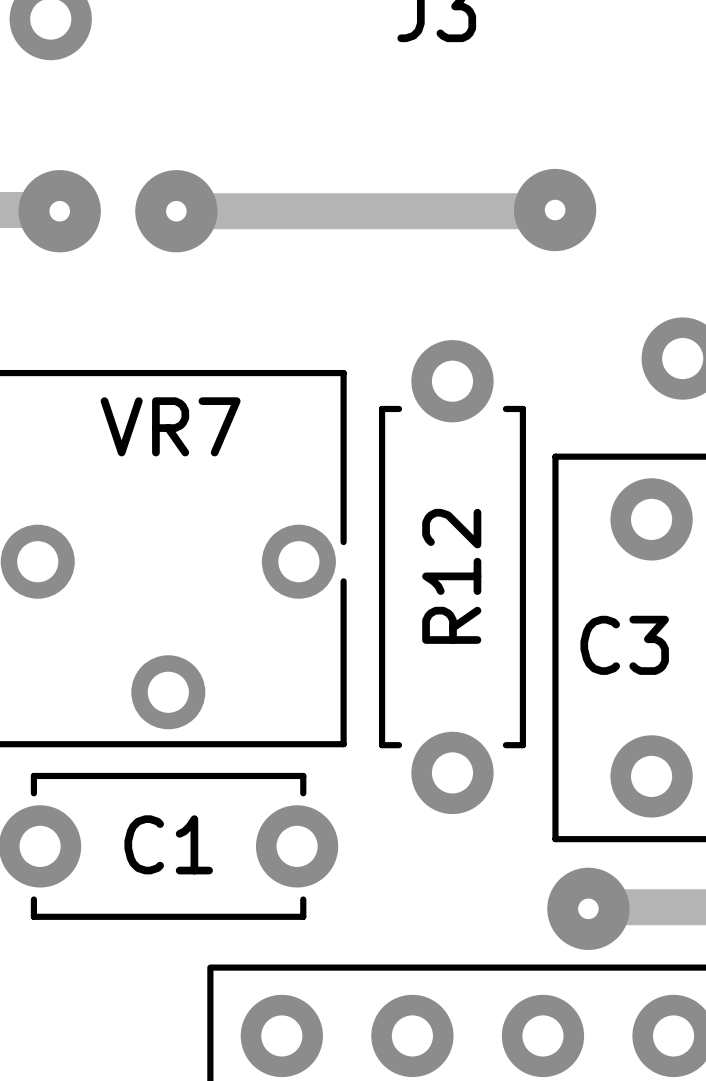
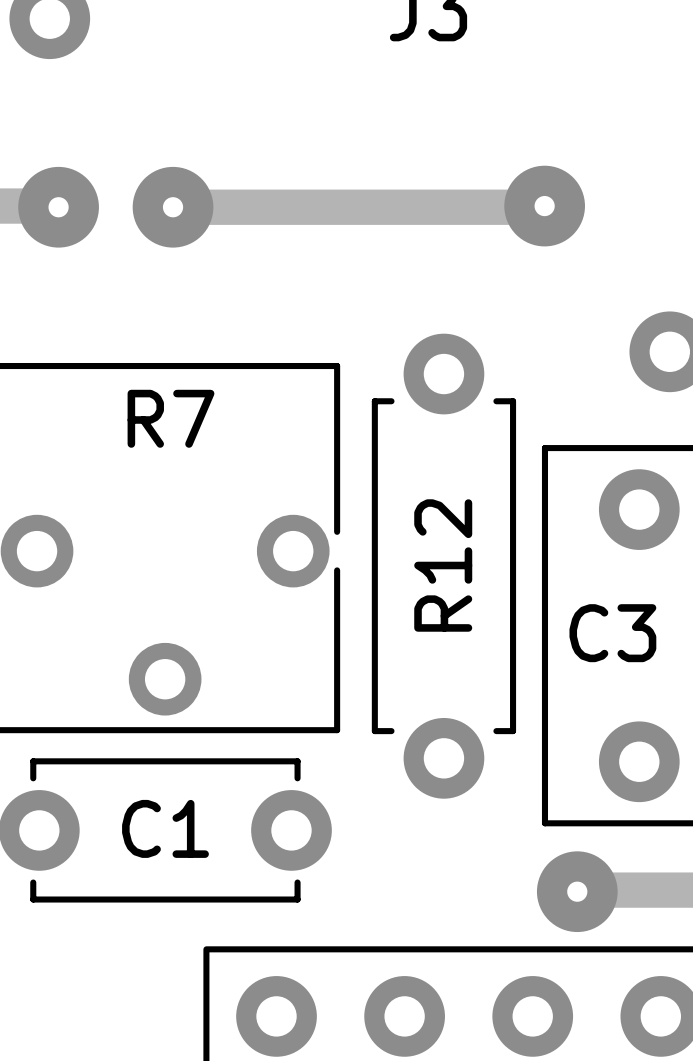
VR7 name: VR7 (170, 426) -> R7 (171, 418)

